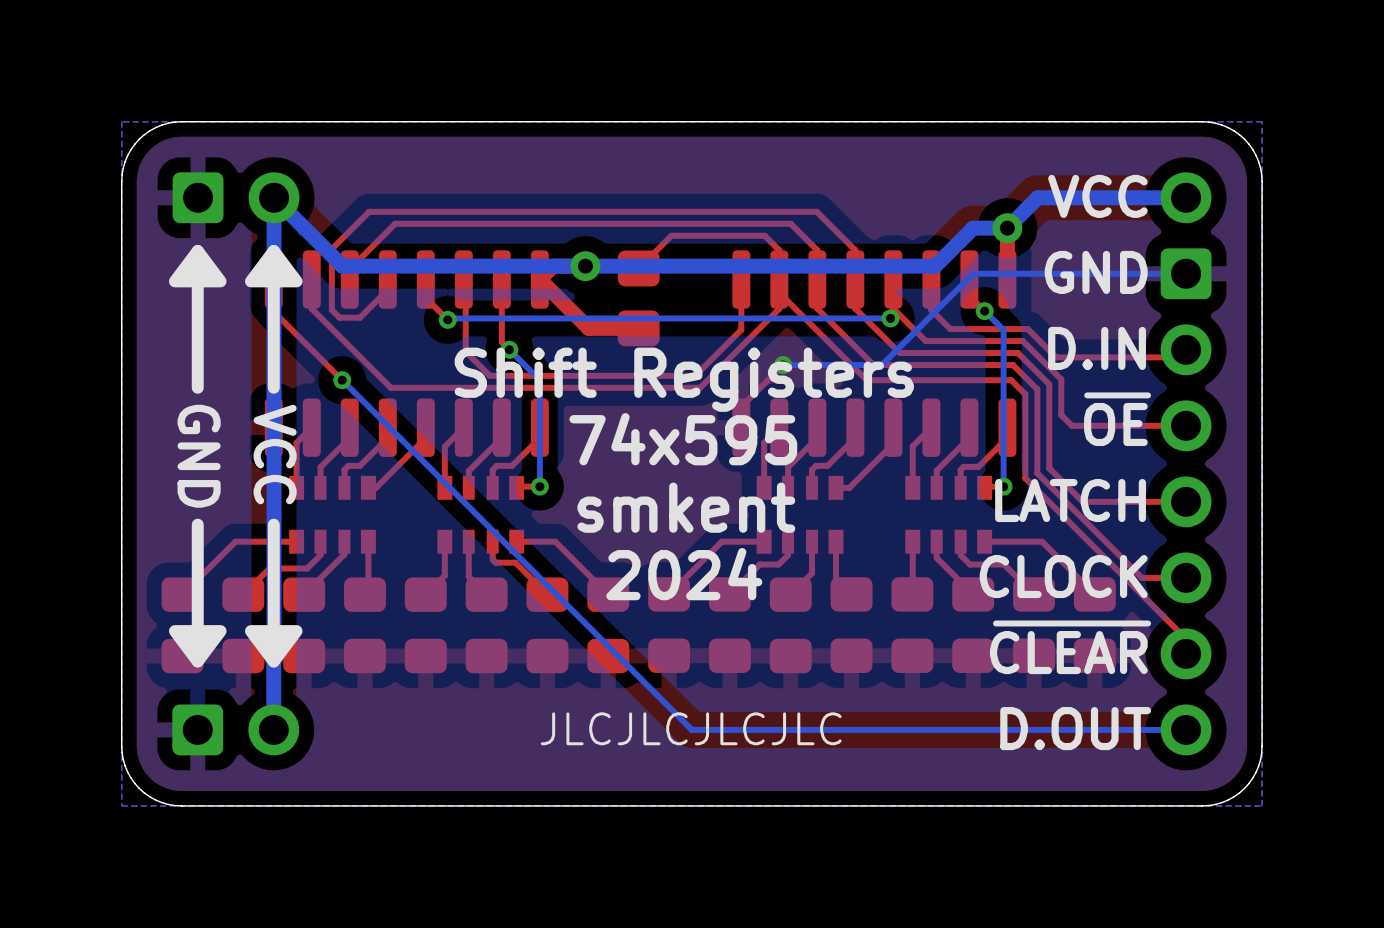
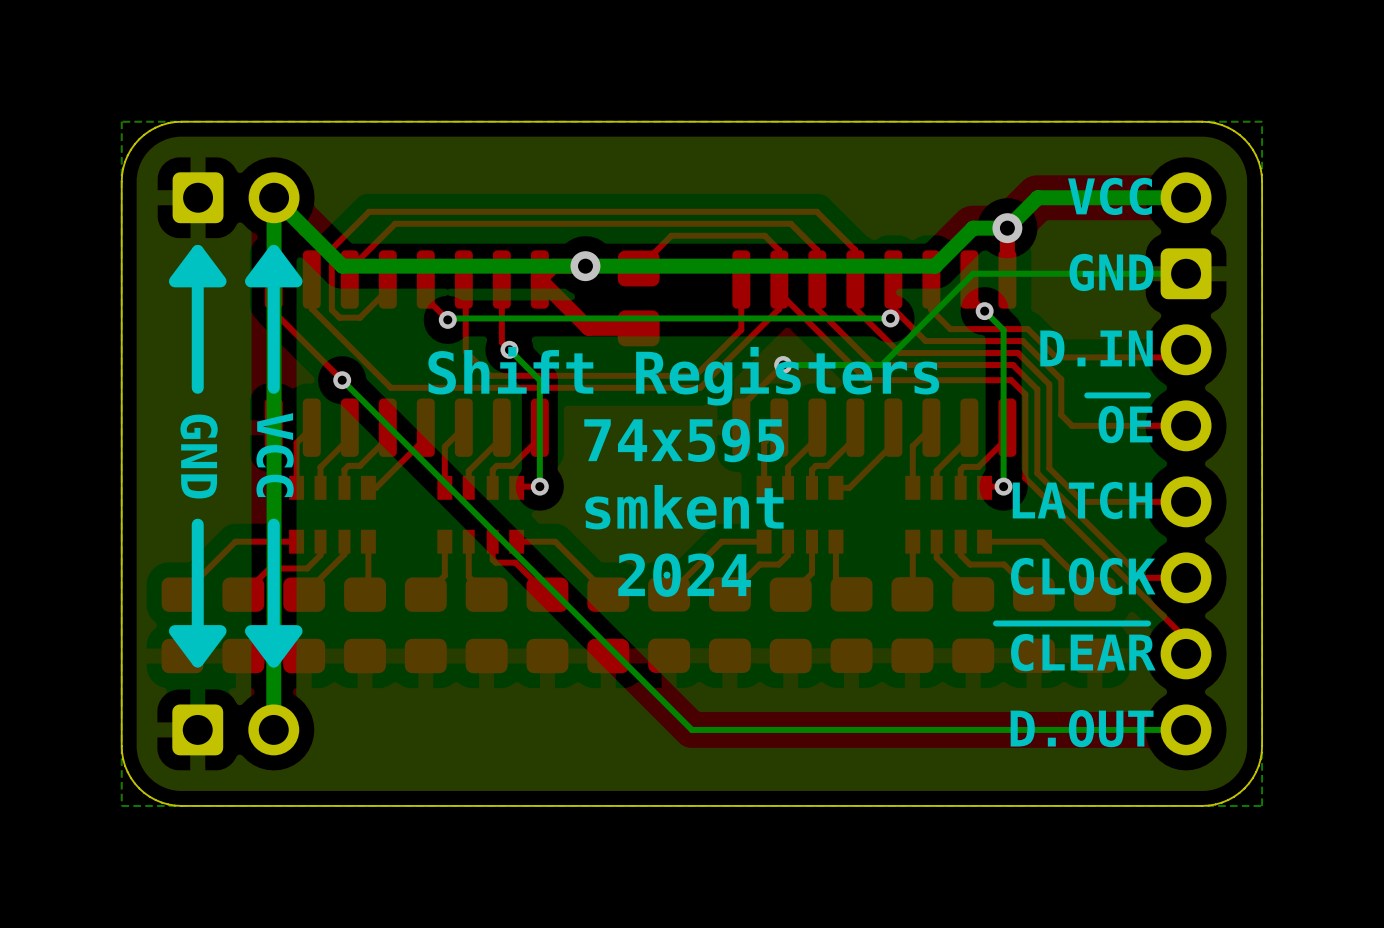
text: JLCJLCJLCJLC (691, 728) -> none

